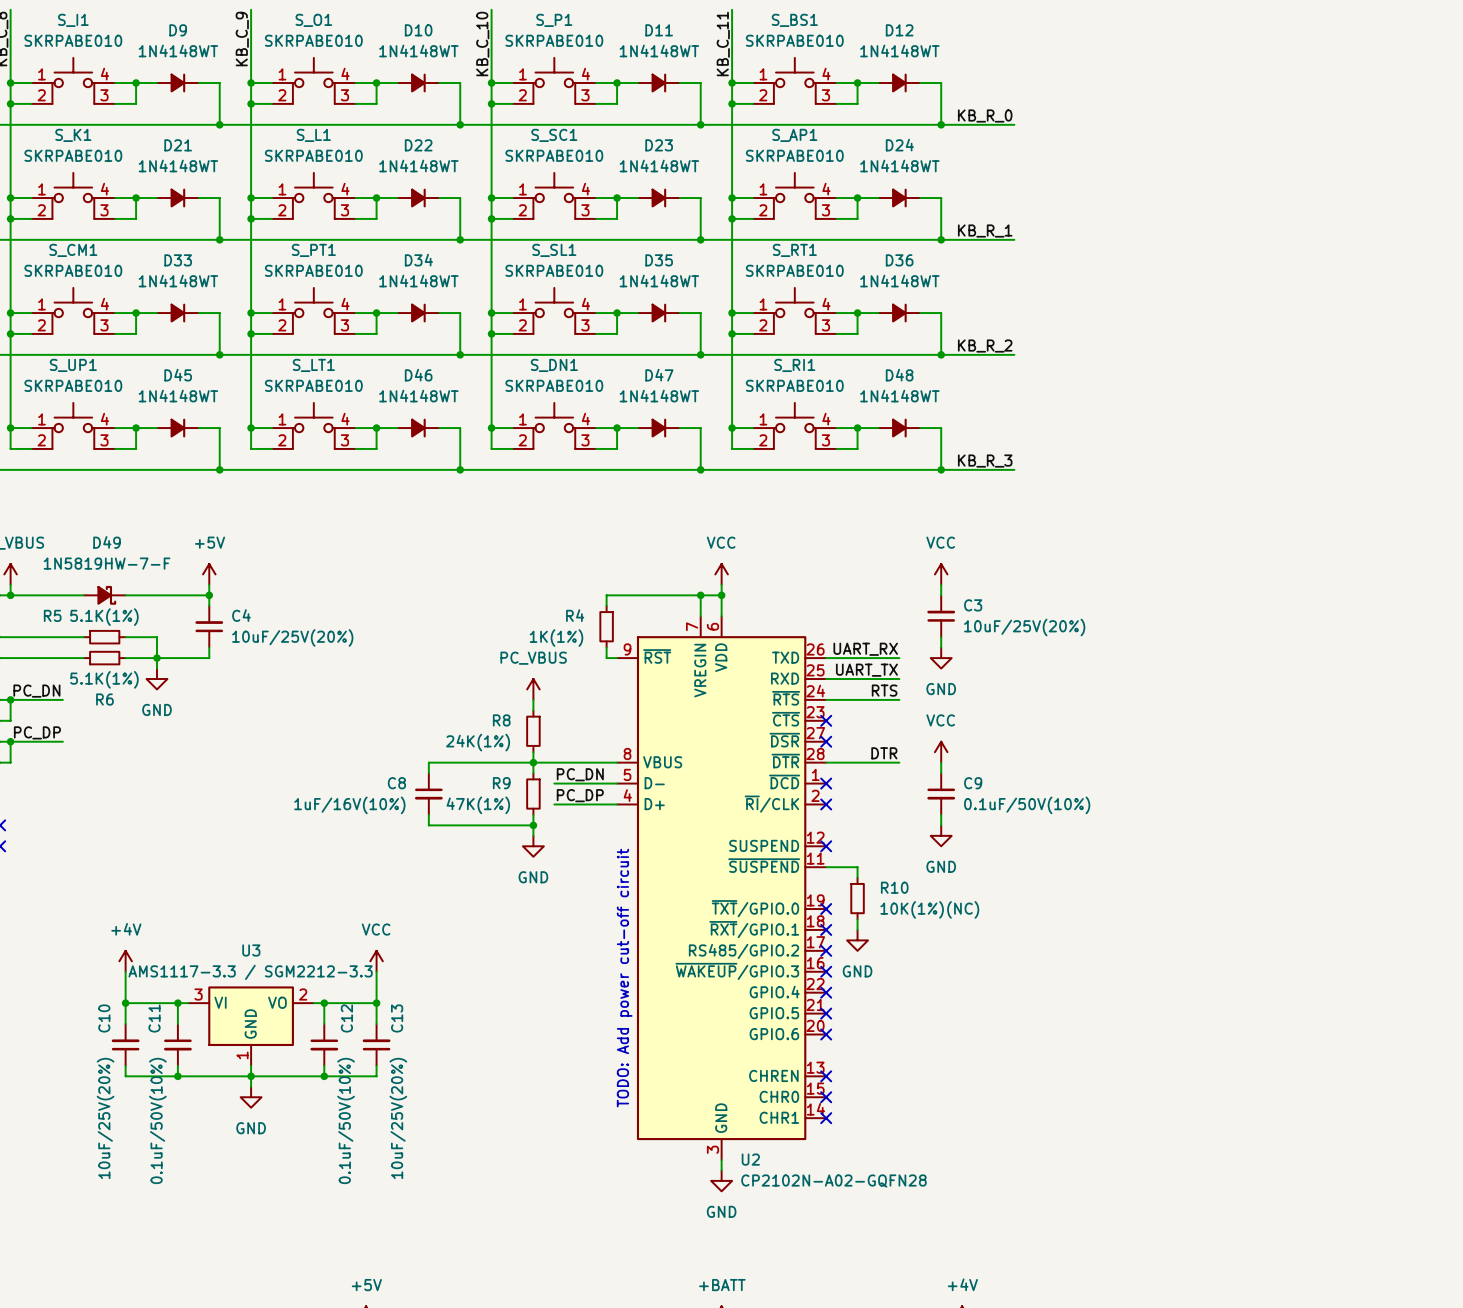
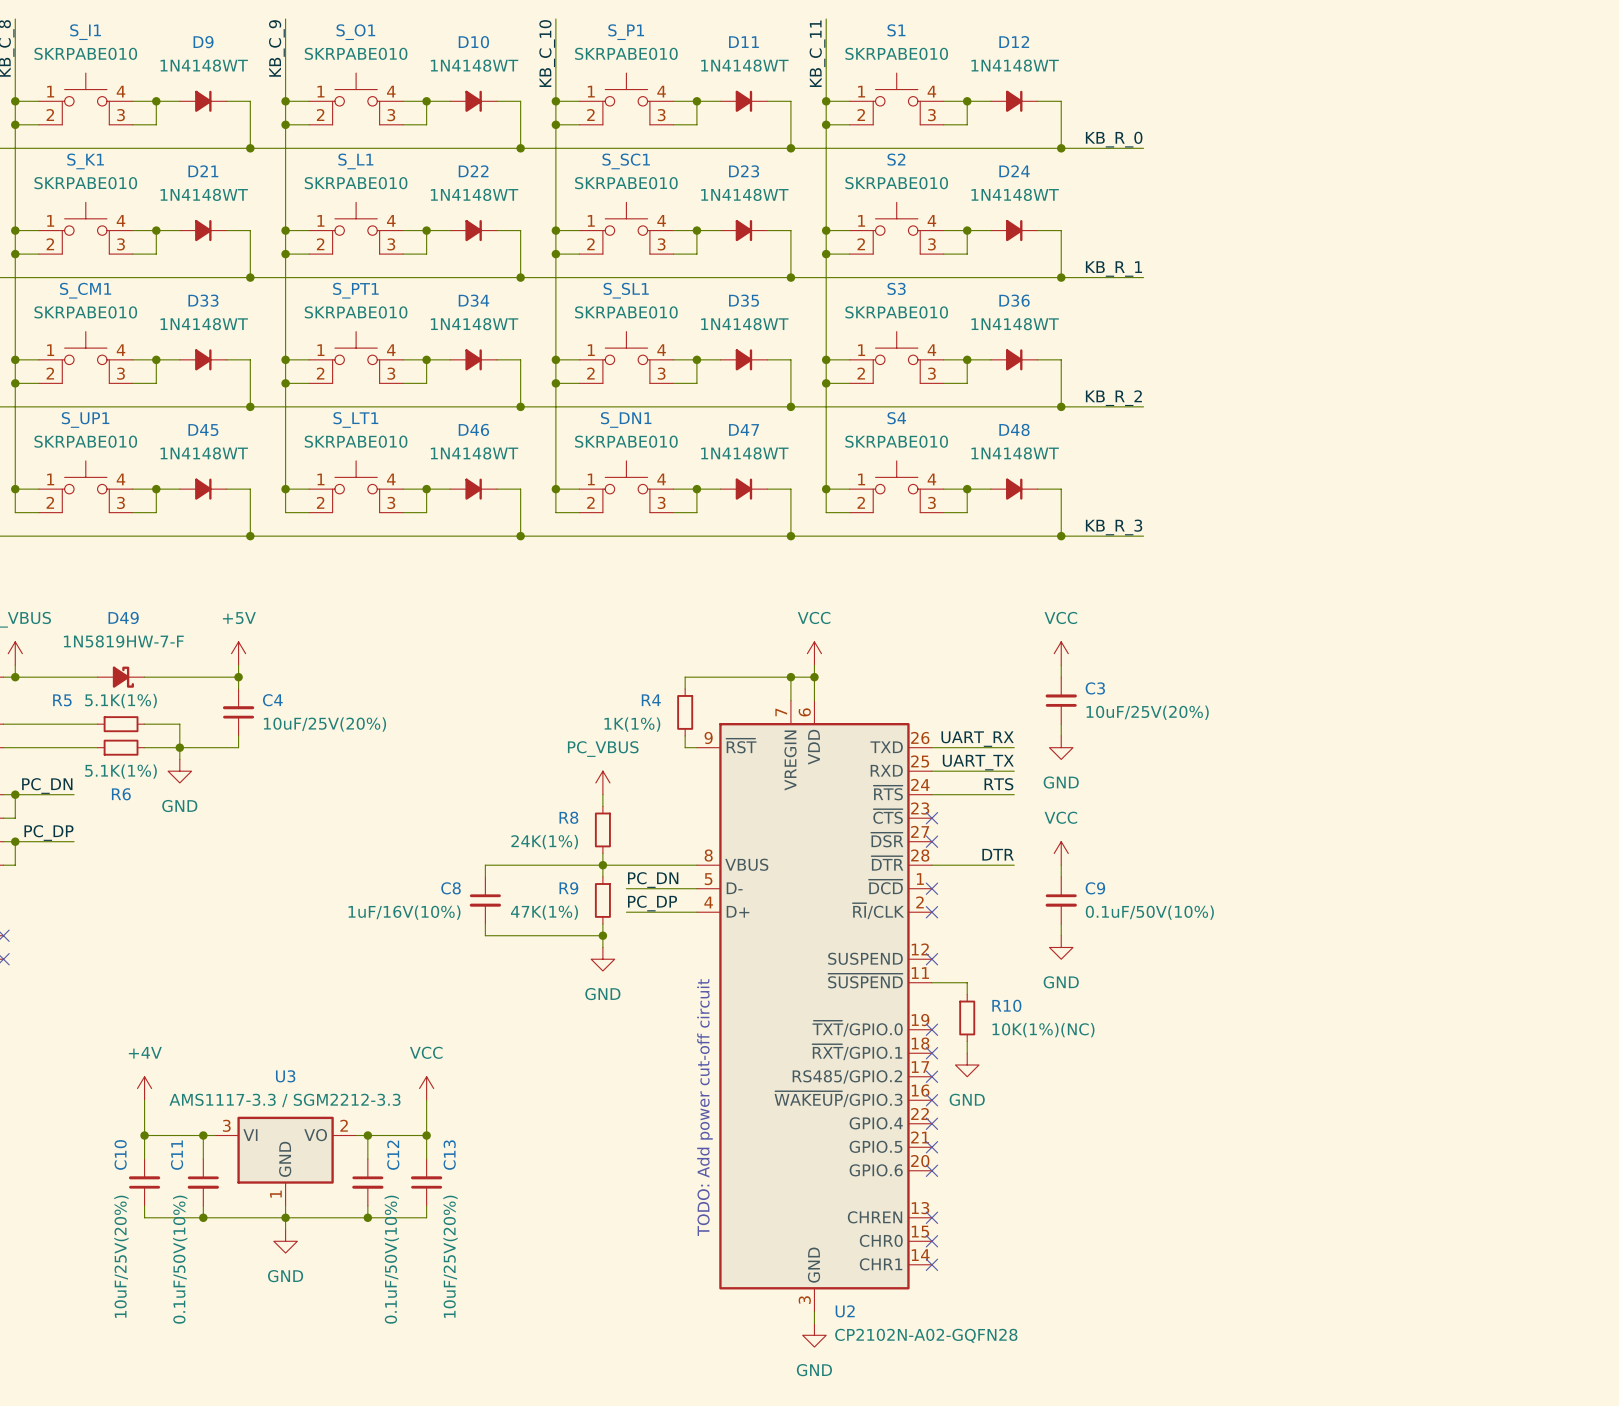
S_BS1 name: S_BS1 (794, 20) -> S1 (896, 30)
S_AP1 name: S_AP1 (794, 135) -> S2 (896, 159)
S_RT1 name: S_RT1 (794, 250) -> S3 (896, 288)
S_RI1 name: S_RI1 (794, 365) -> S4 (896, 418)

